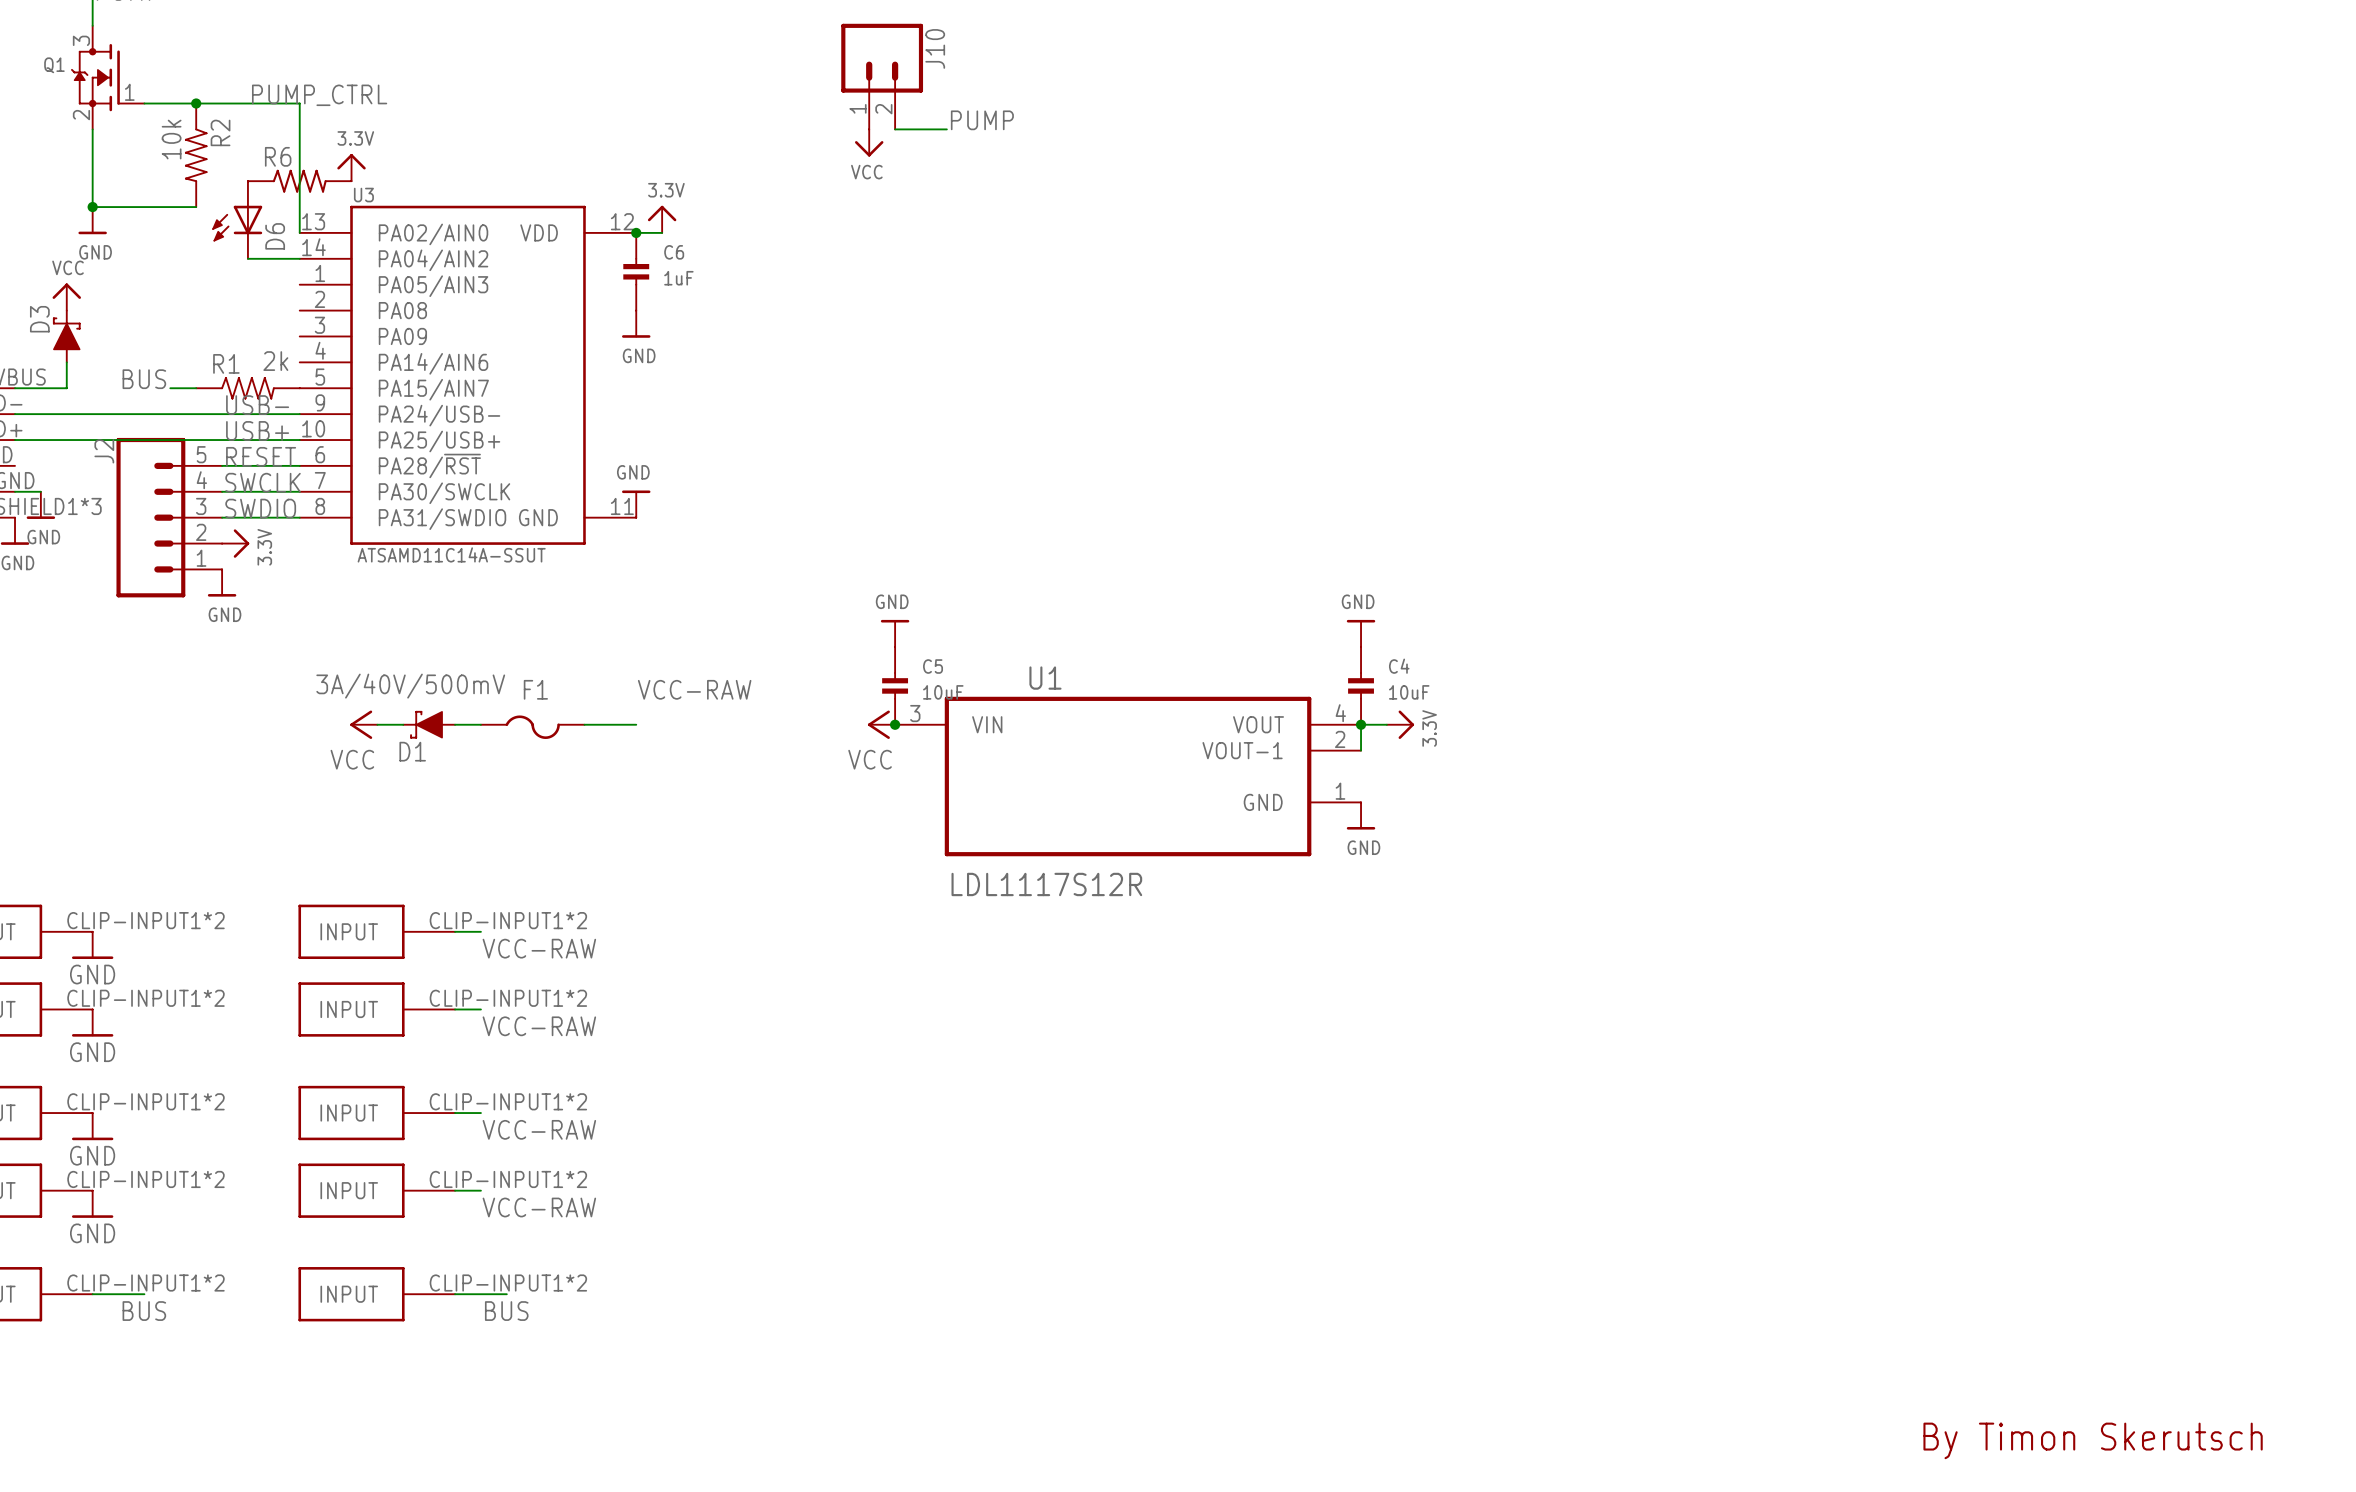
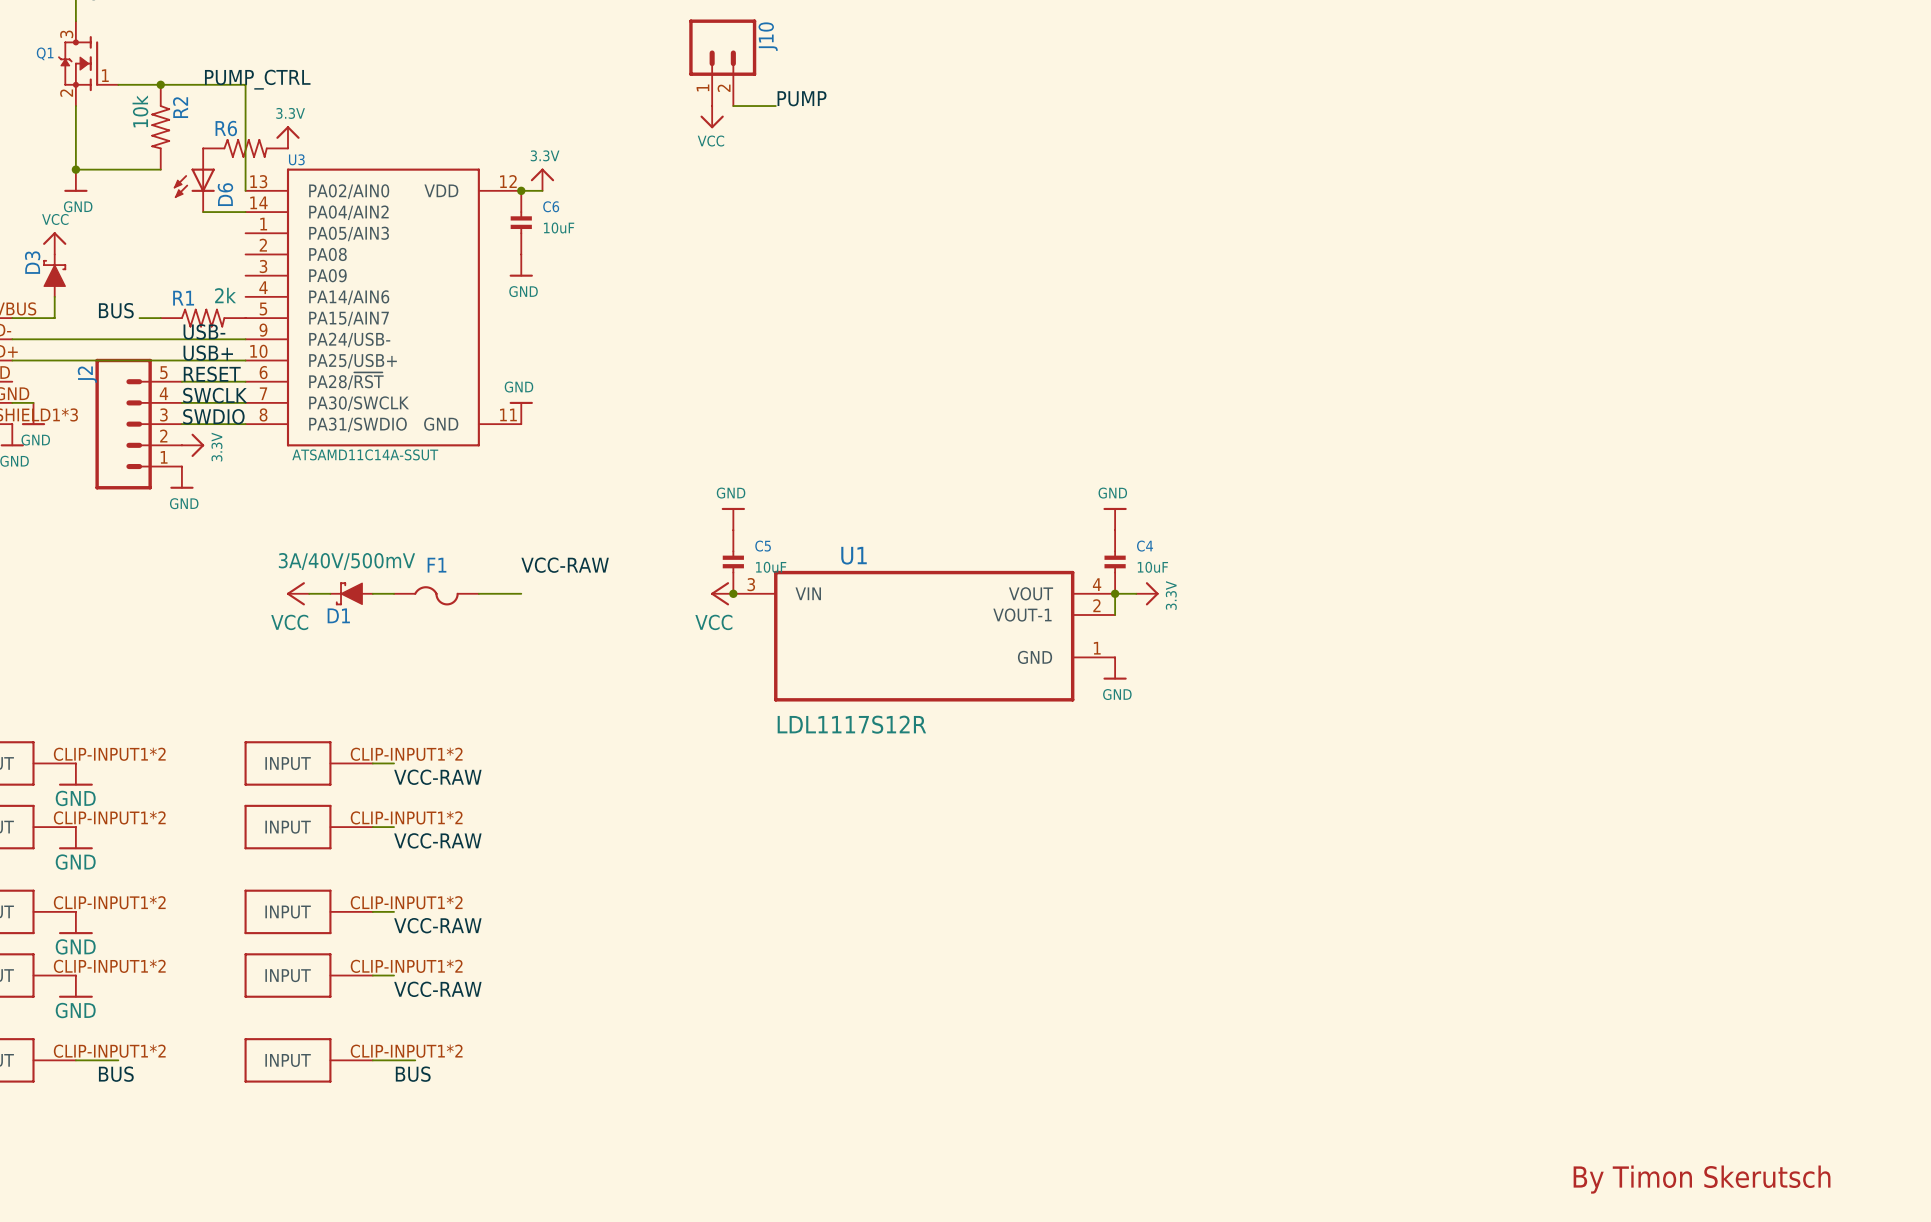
C6 value: 1uF (678, 278) -> 10uF (559, 227)

